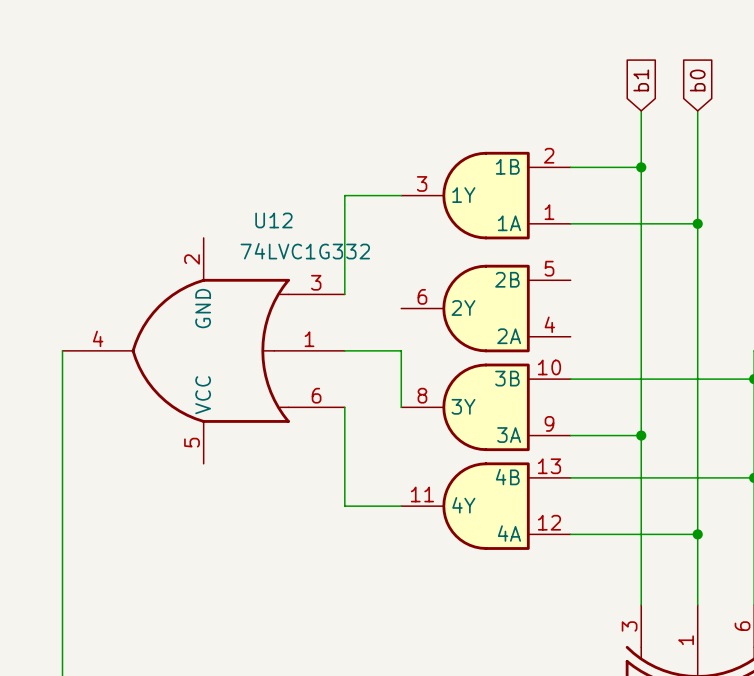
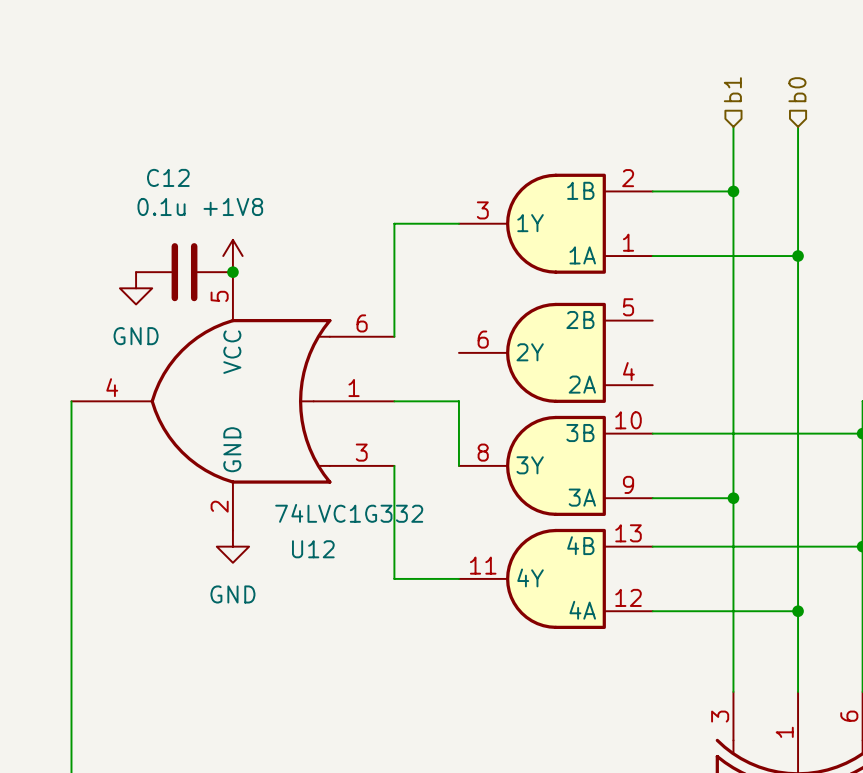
hierarchical label: none -> b1 (732, 89)
hierarchical label: none -> b0 (797, 89)
global label: b1 (641, 80) -> none
global label: b0 (697, 80) -> none
power symbol: none -> +1V8 (232, 256)
C12: none -> 0.1u (184, 272)
junction: none -> (232, 272)
power symbol: none -> GND (136, 288)
U12 flip: as is (210, 350) -> up-down (241, 401)
power symbol: none -> GND (232, 546)

